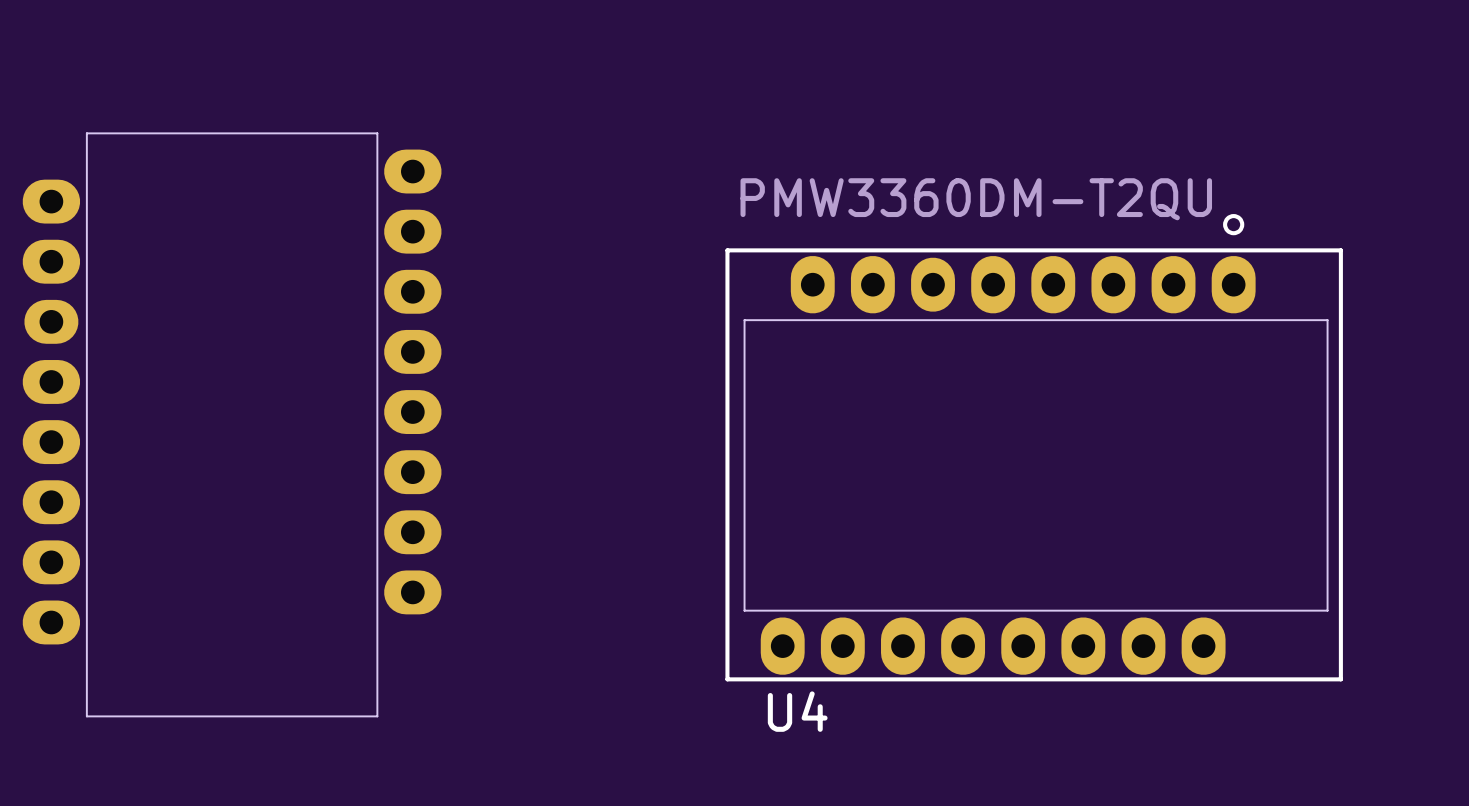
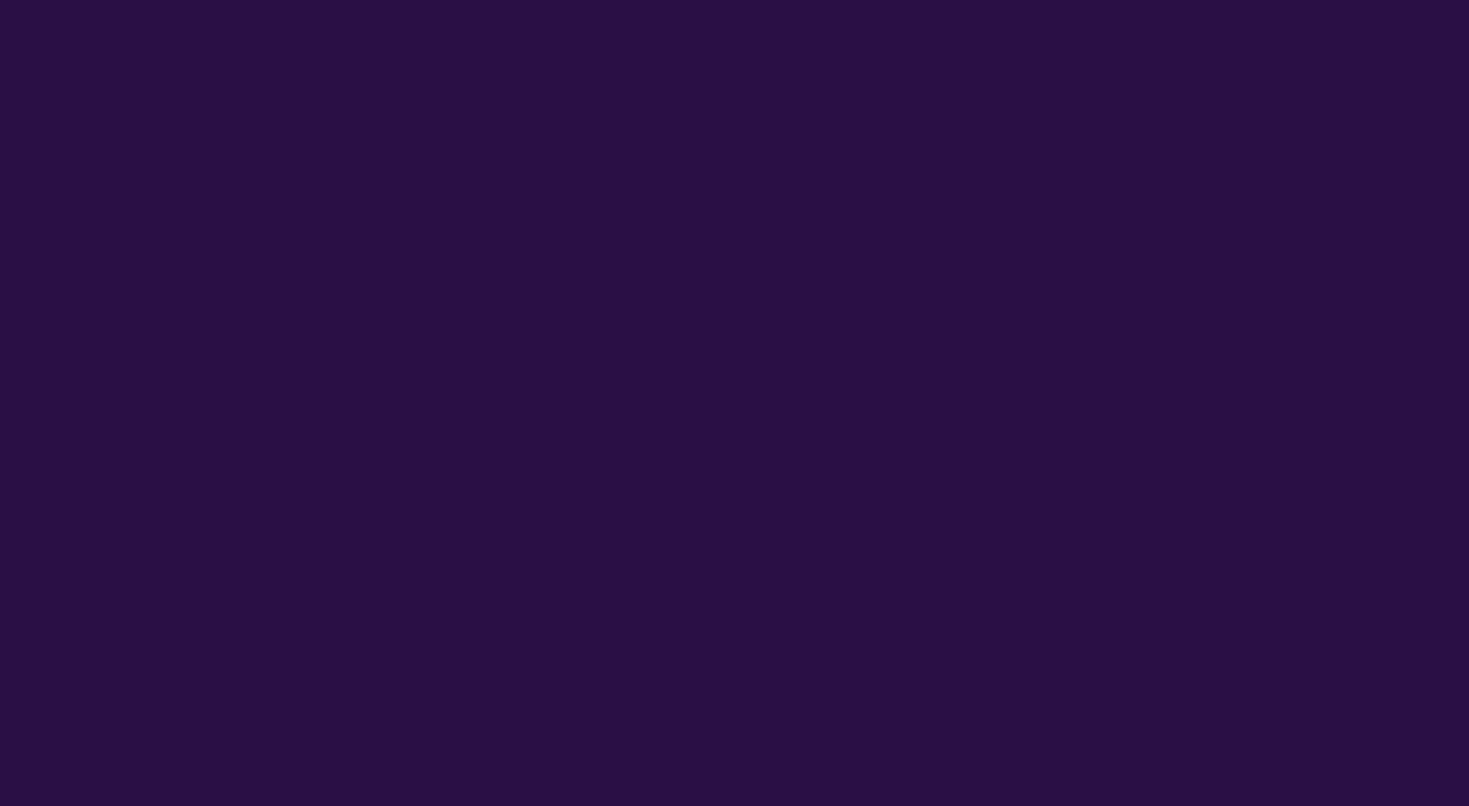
part: (232, 424) -> none
U4: PMW3360DM-T2QU (1034, 447) -> none

